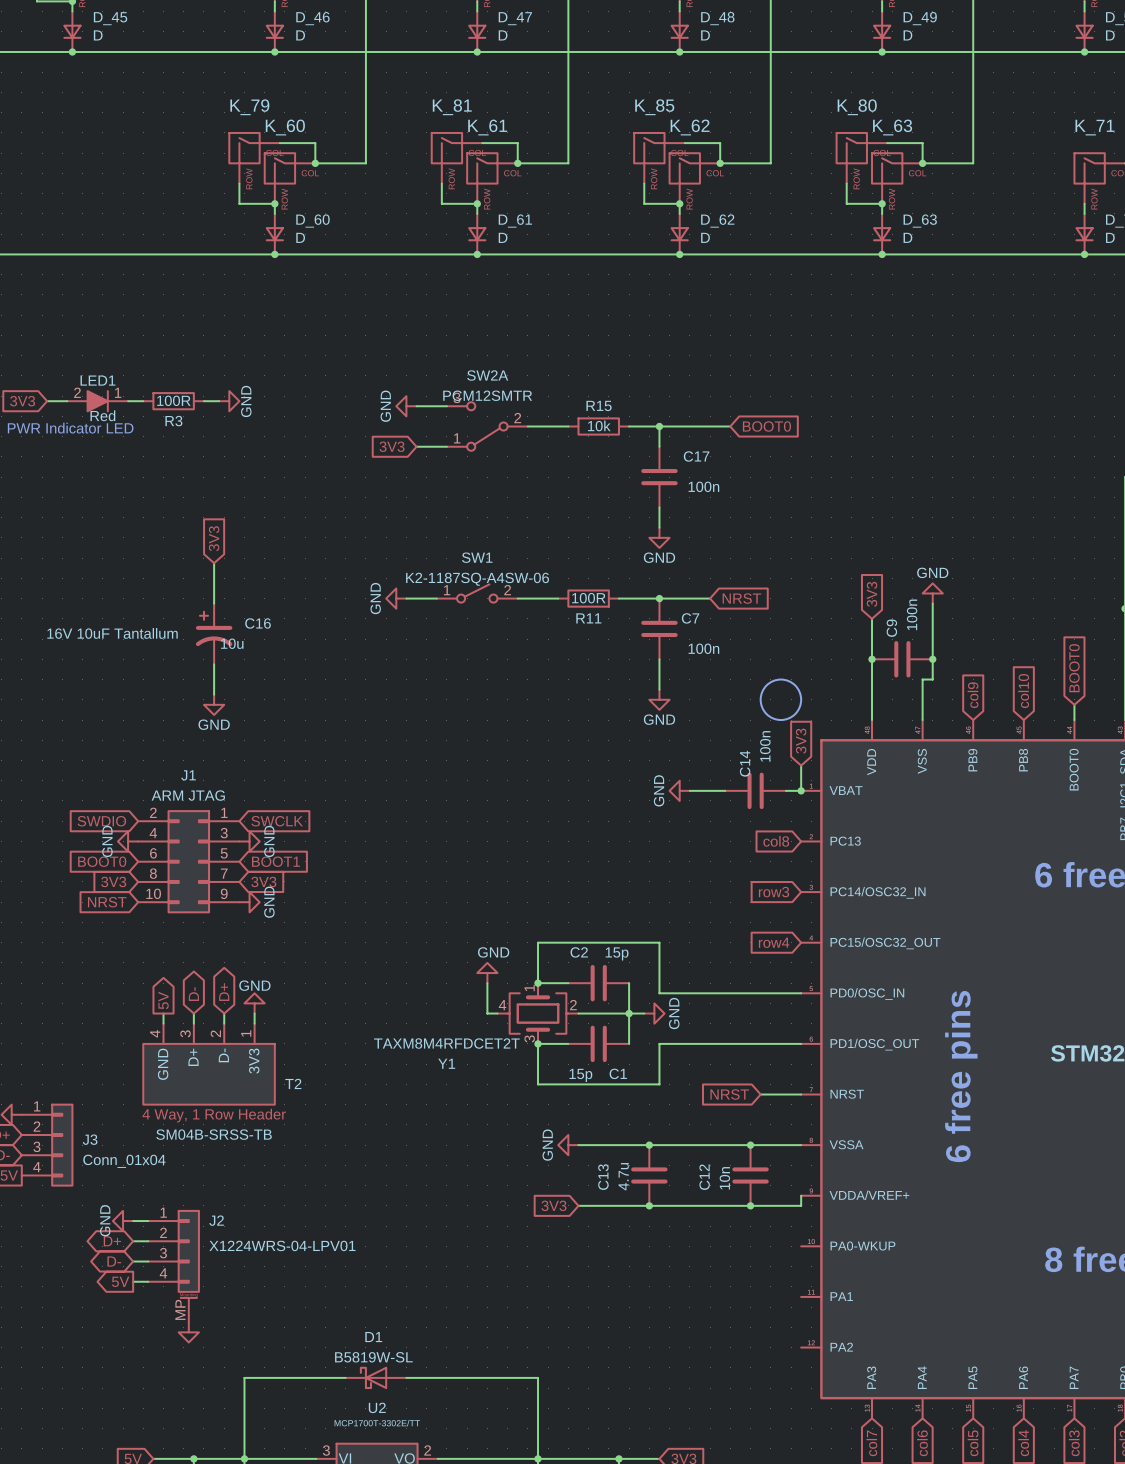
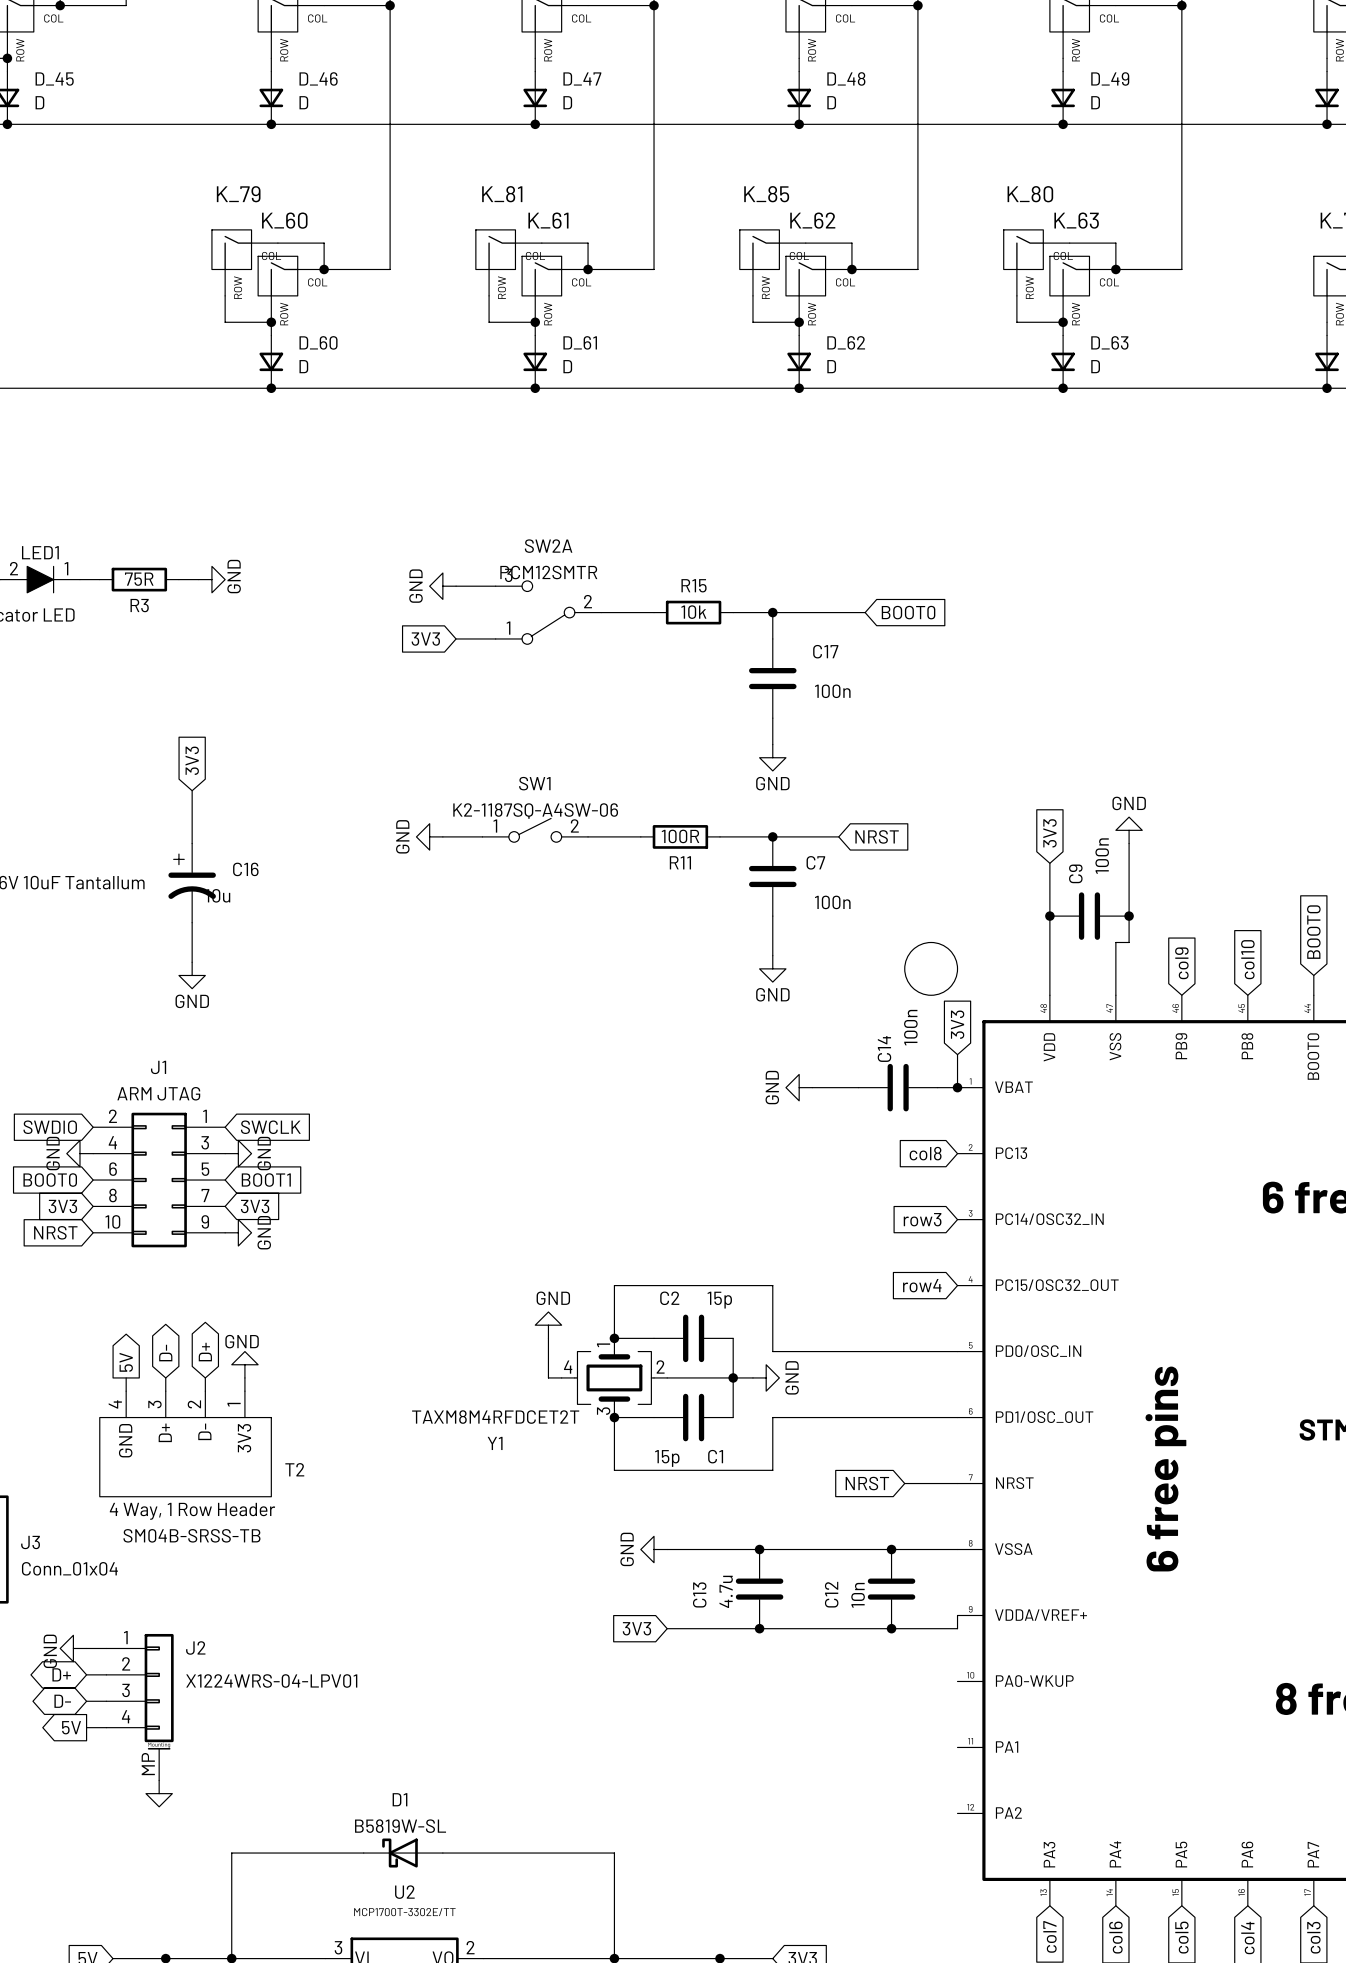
R3 value: 100R (173, 400) -> 75R (139, 579)
LED1 value: Red (102, 415) -> none

